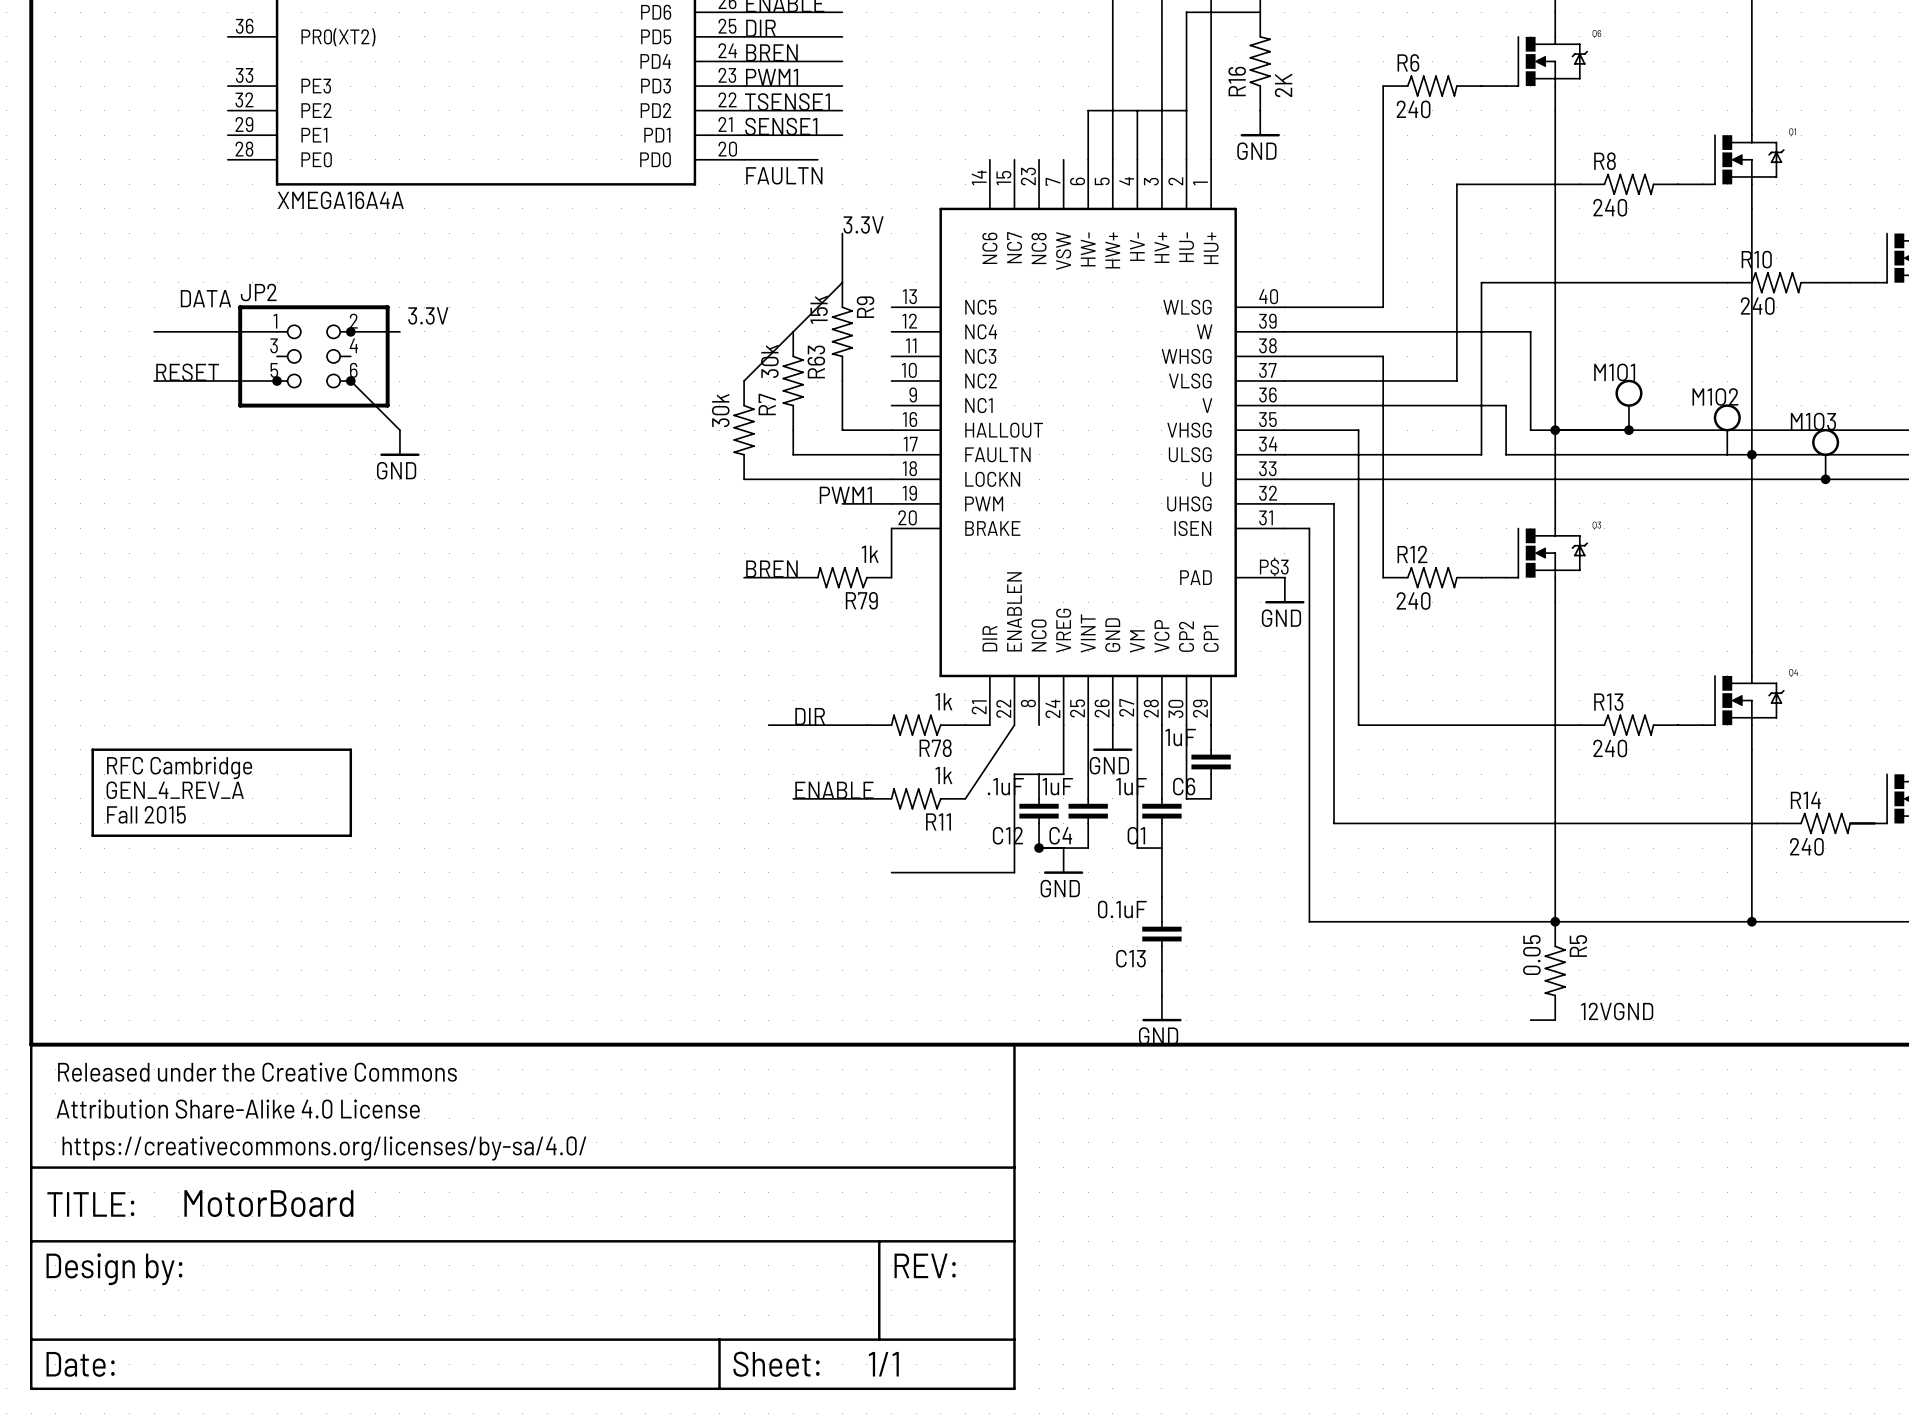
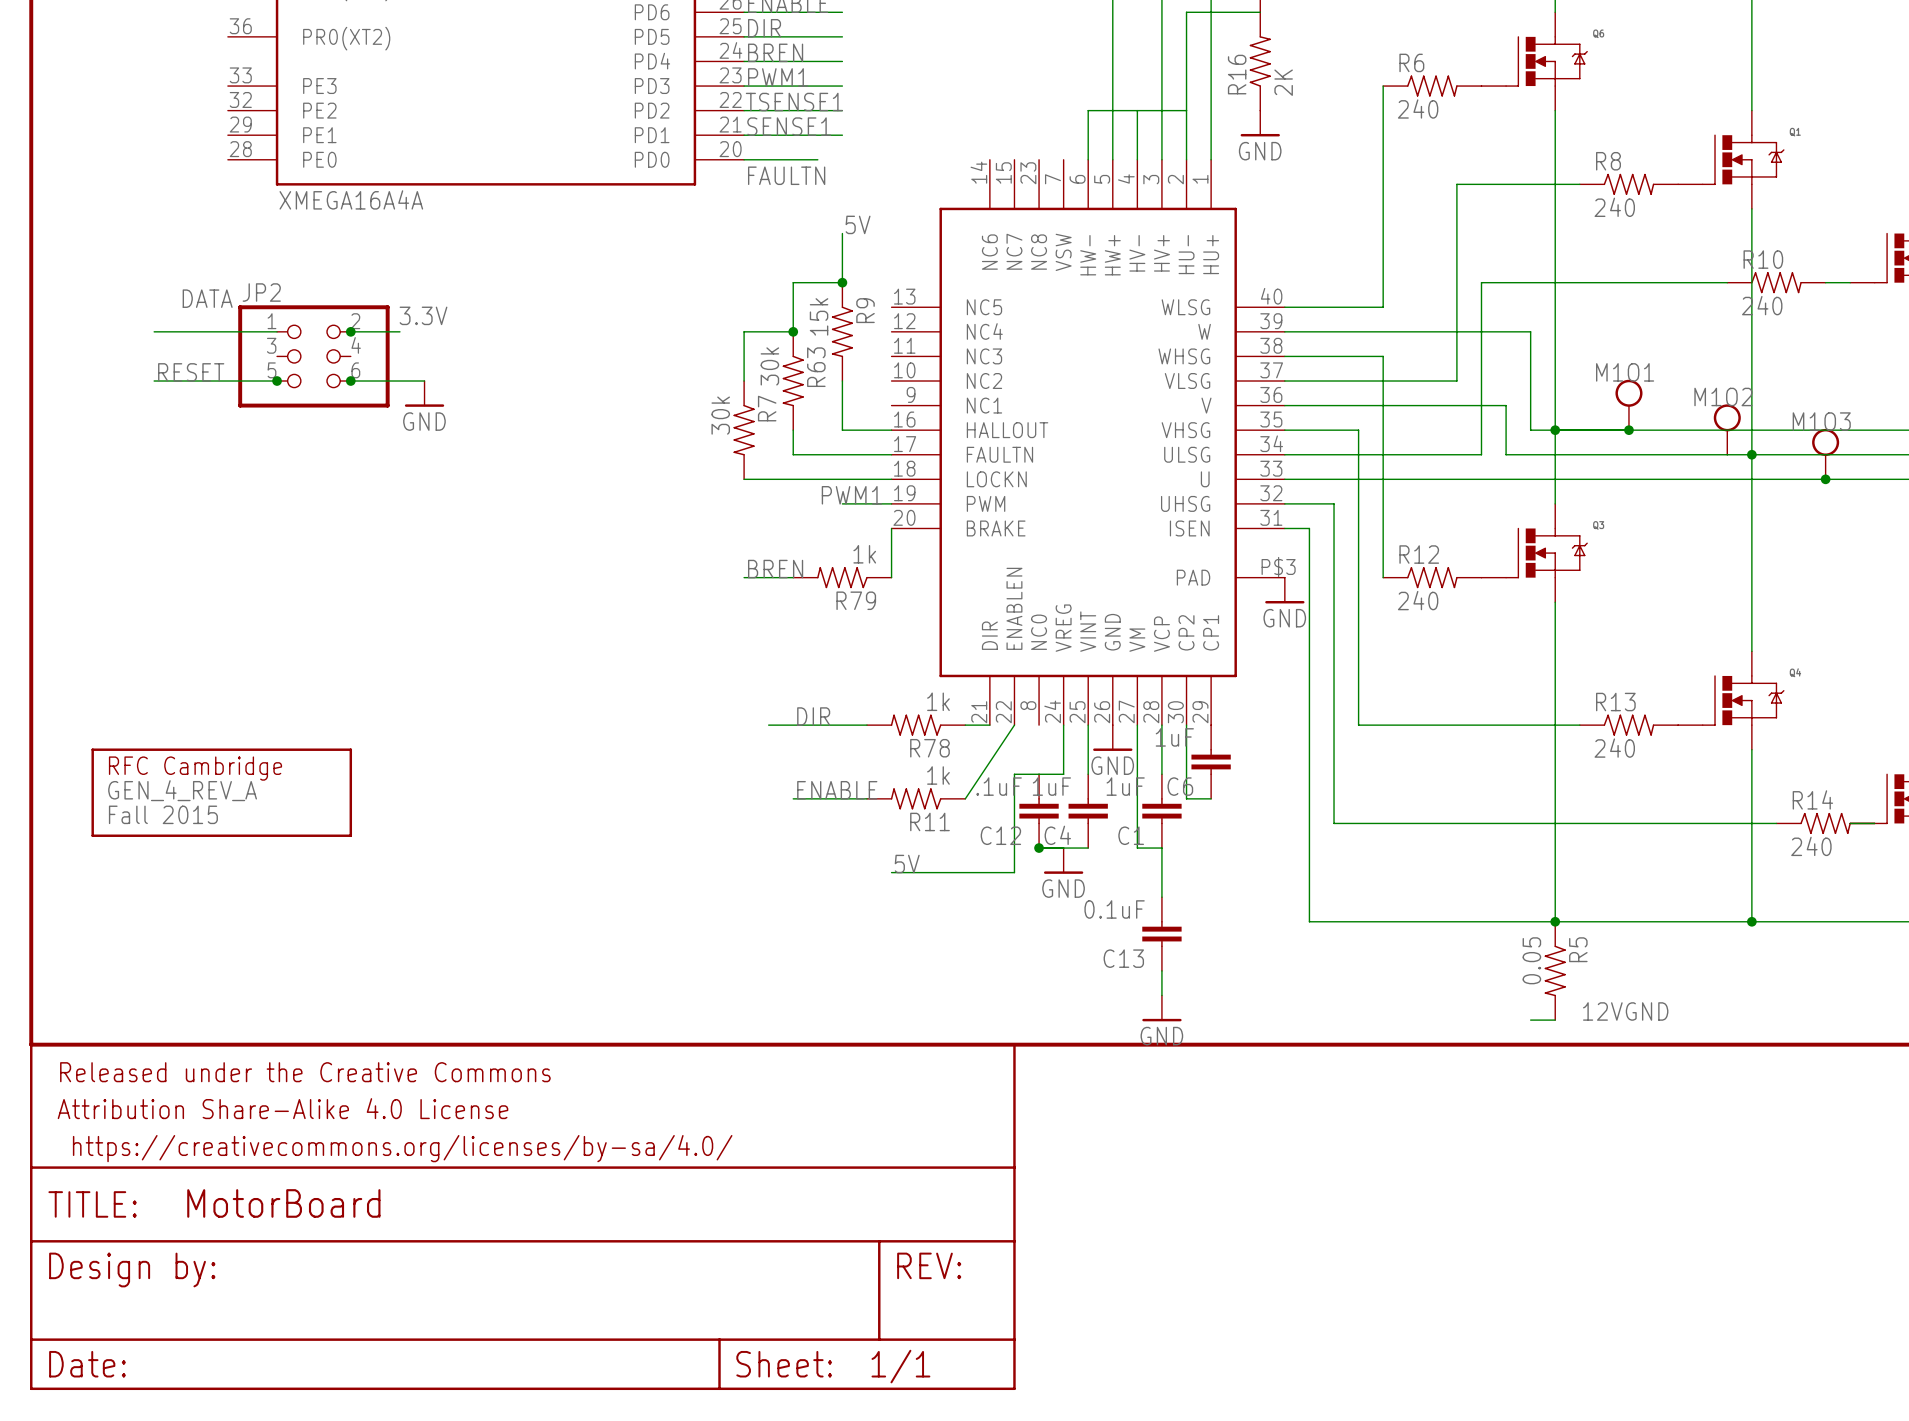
text: none -> 5V (858, 224)
label: 3.3V (863, 225) -> none
wire: (842, 282) (744, 381) -> (842, 282) (793, 282) (793, 331) (744, 331) (744, 381)
junction: none -> (842, 282)
junction: none -> (793, 331)
wire: (350, 381) (399, 430) -> (350, 381) (424, 381)
power symbol position: GND (399, 443) -> GND (424, 393)
text: none -> 5V (907, 864)

